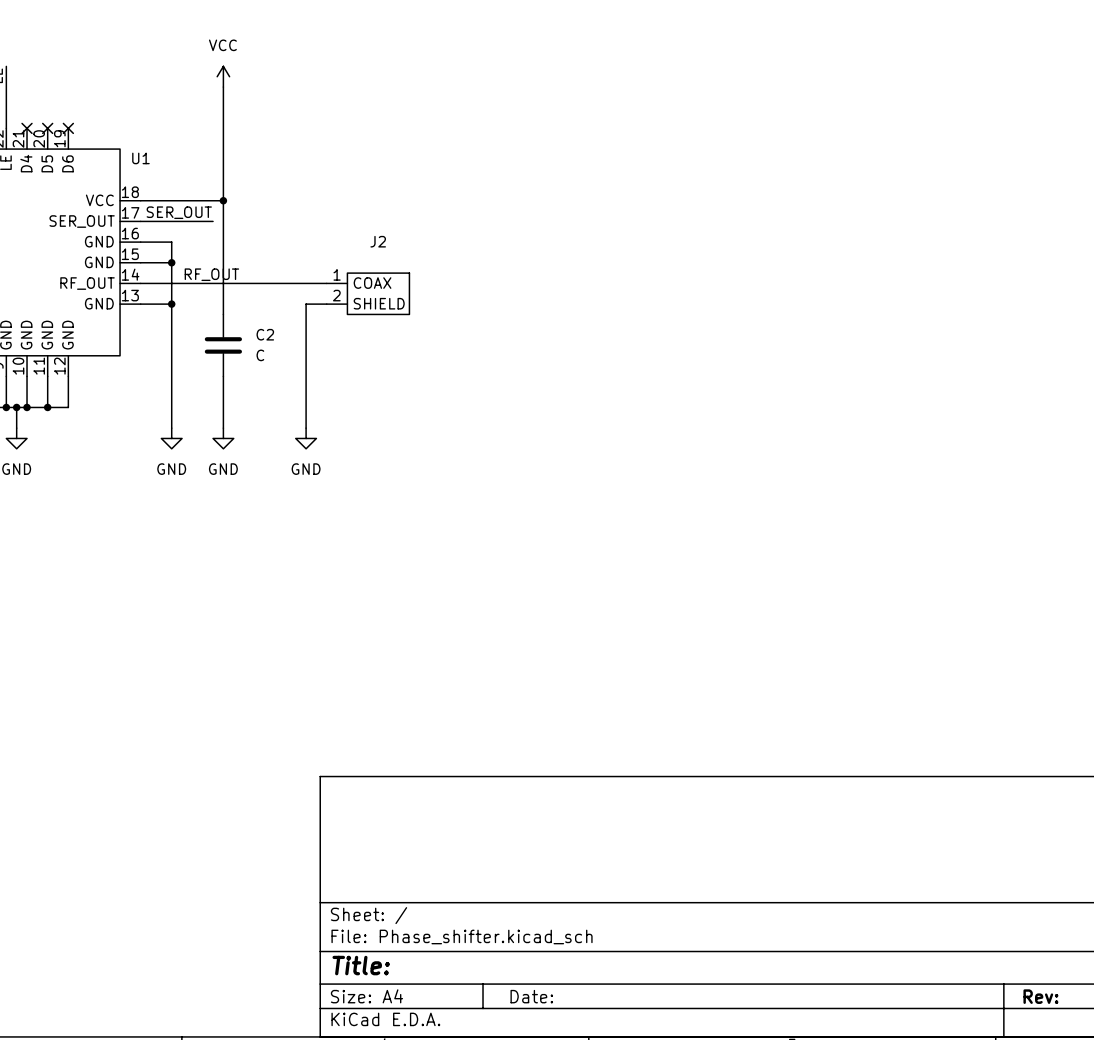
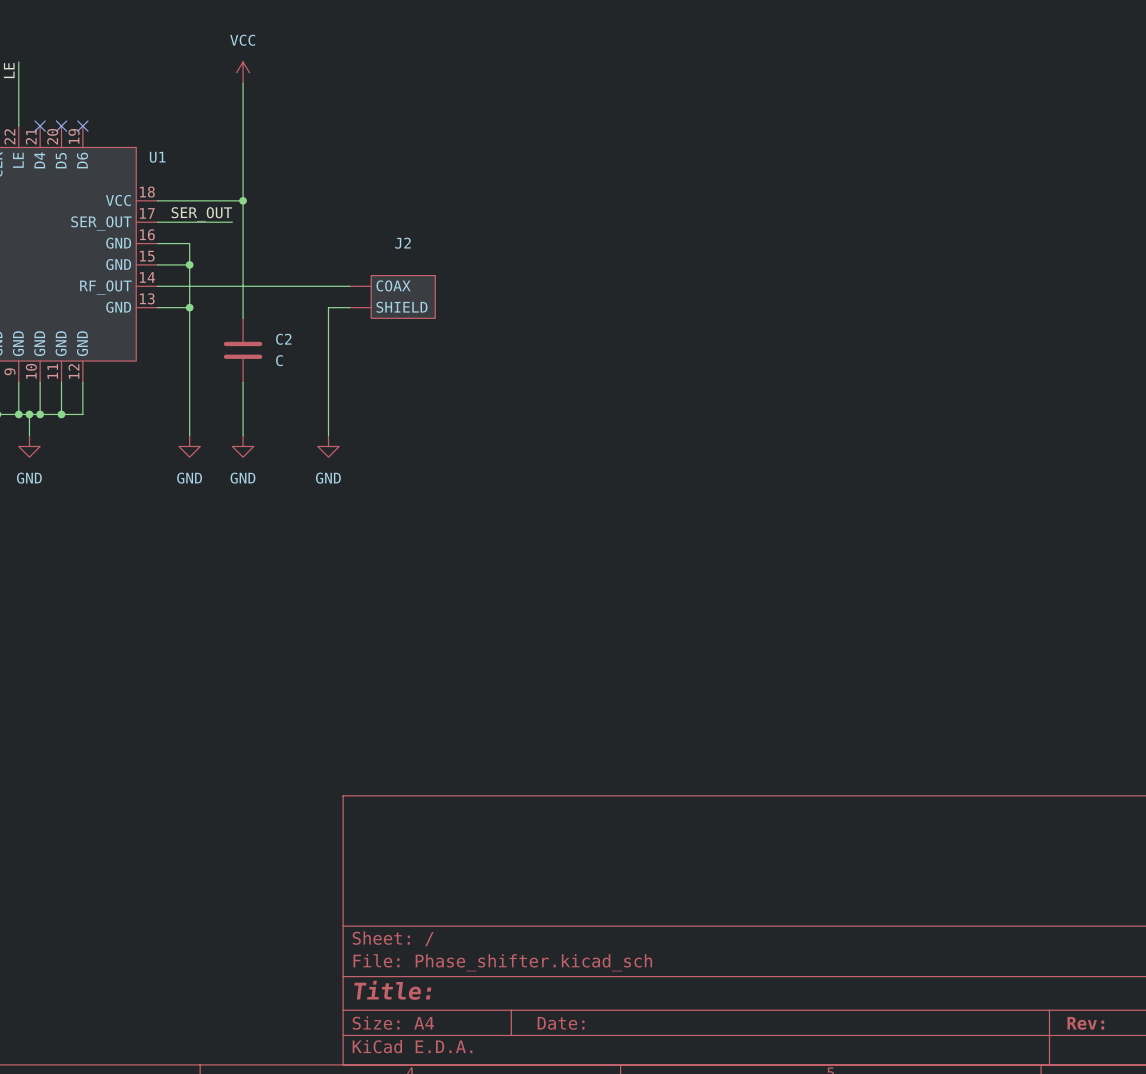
label: RF_OUT (211, 274) -> none
J2 pin number: 1 (337, 274) -> none
J2 pin number: 2 (336, 295) -> none

